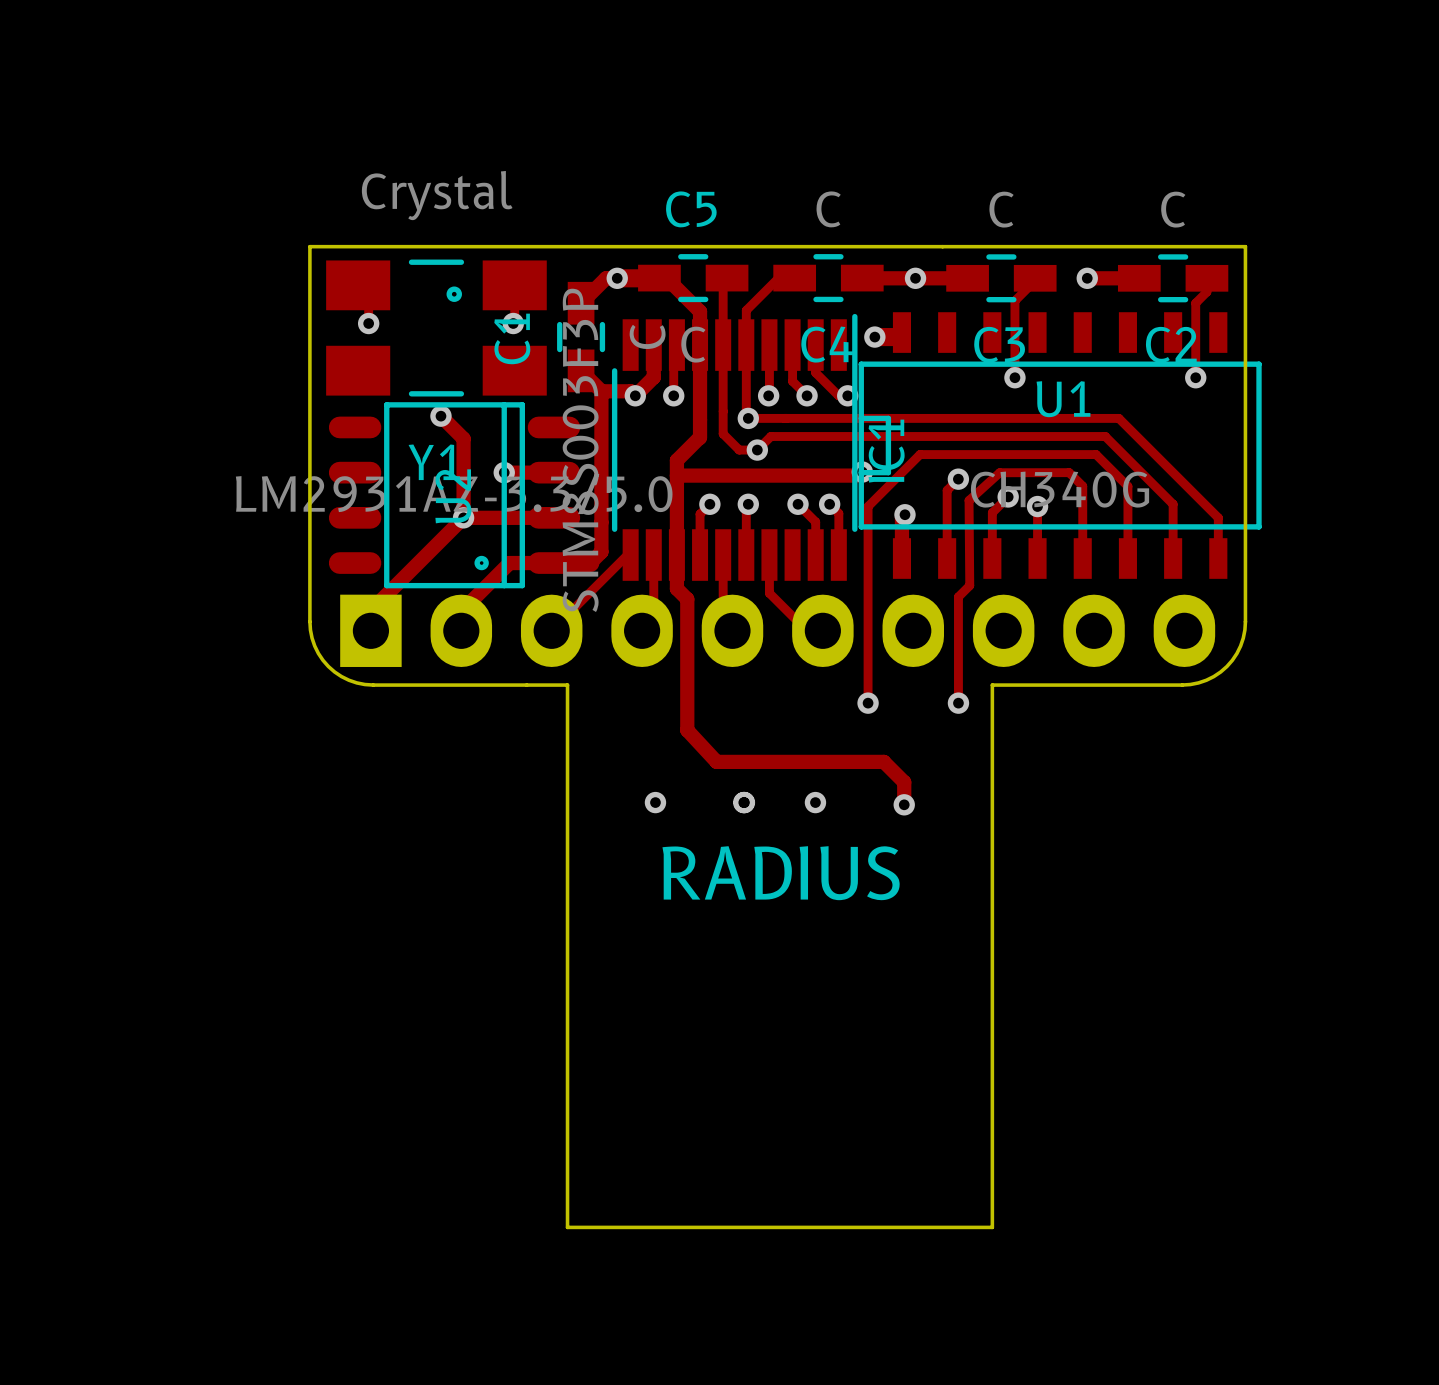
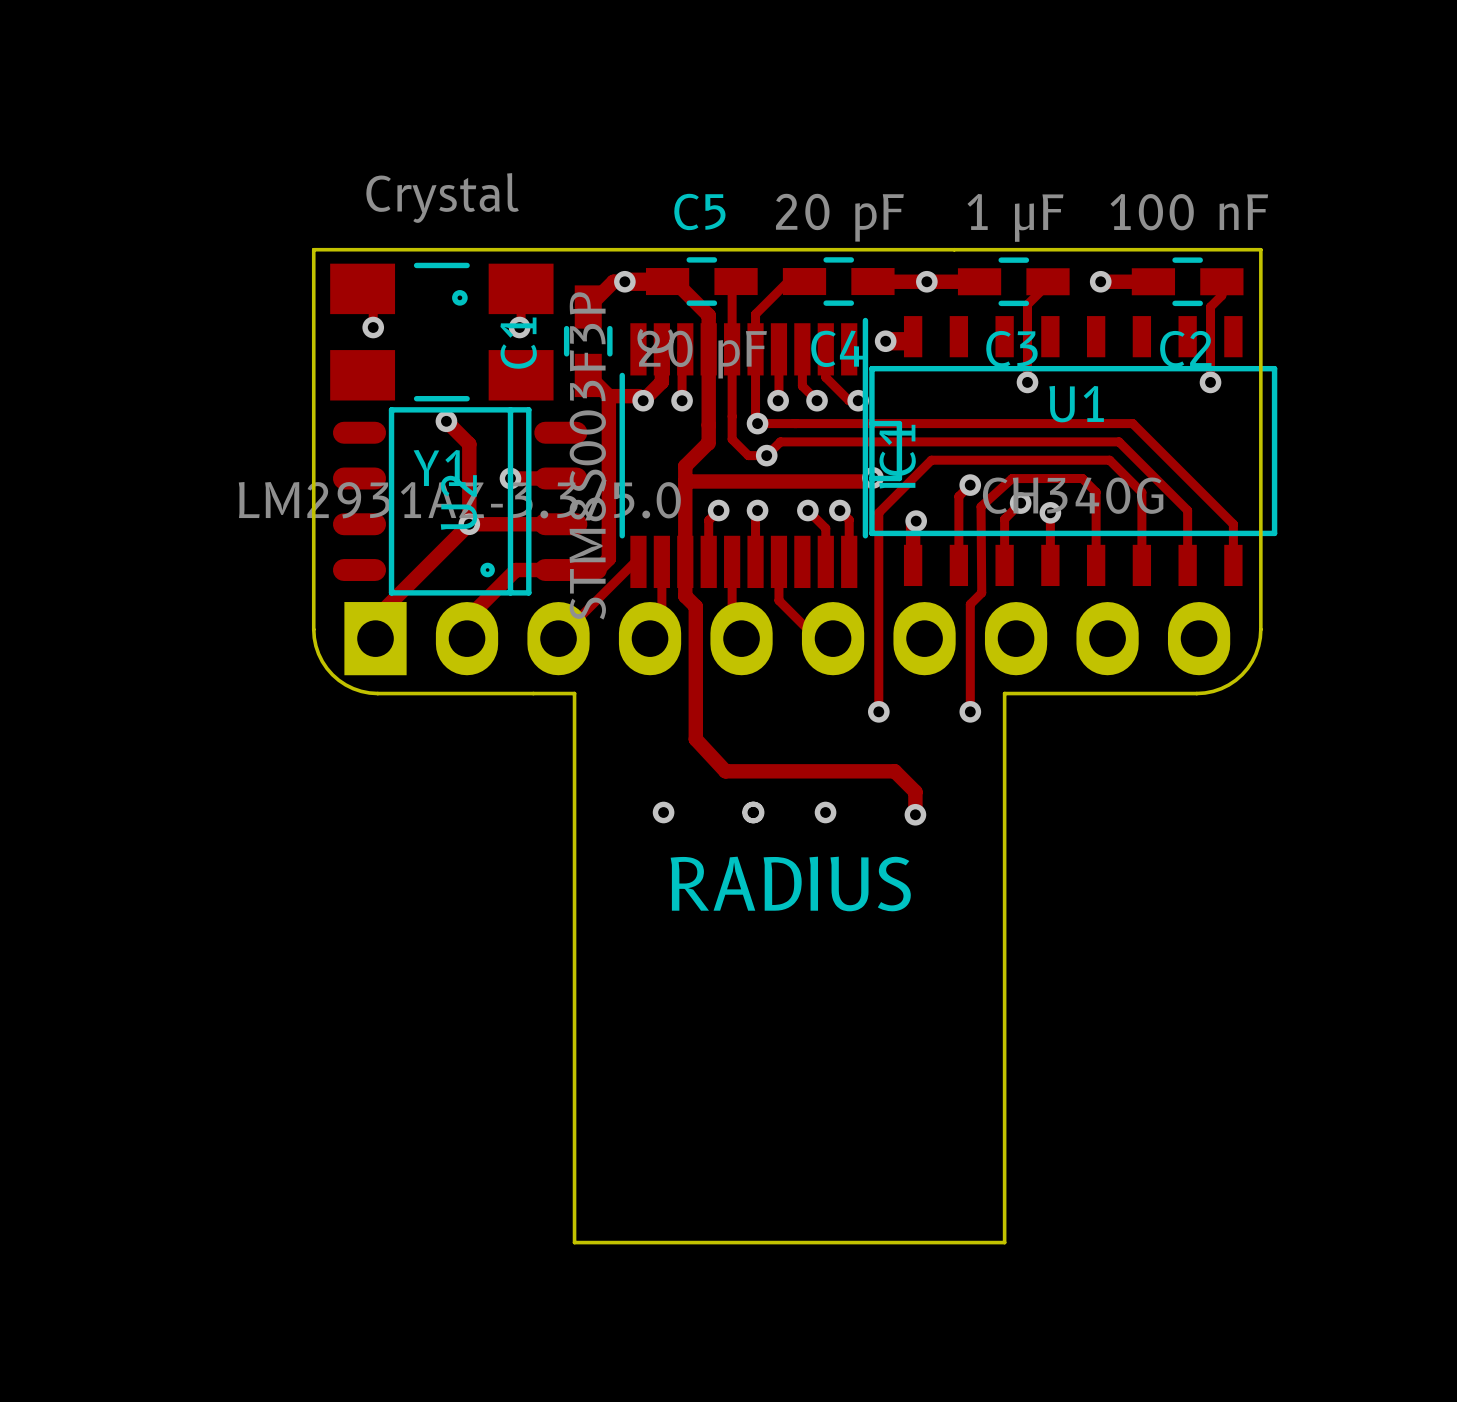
C4 value: C (828, 209) -> 20 pF (839, 217)
C3 value: C (1001, 209) -> 1 μF (1015, 217)
C2 value: C (1173, 209) -> 100 nF (1189, 212)
C5 value: C (693, 344) -> 20 pF (702, 354)

